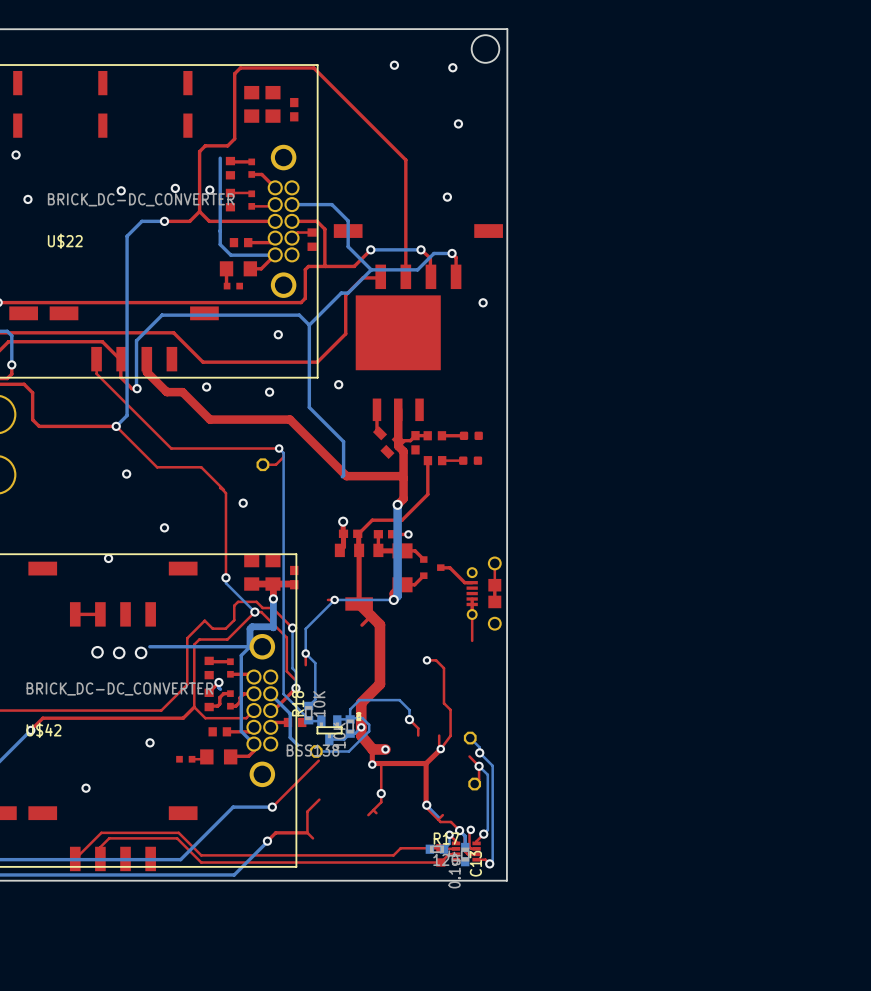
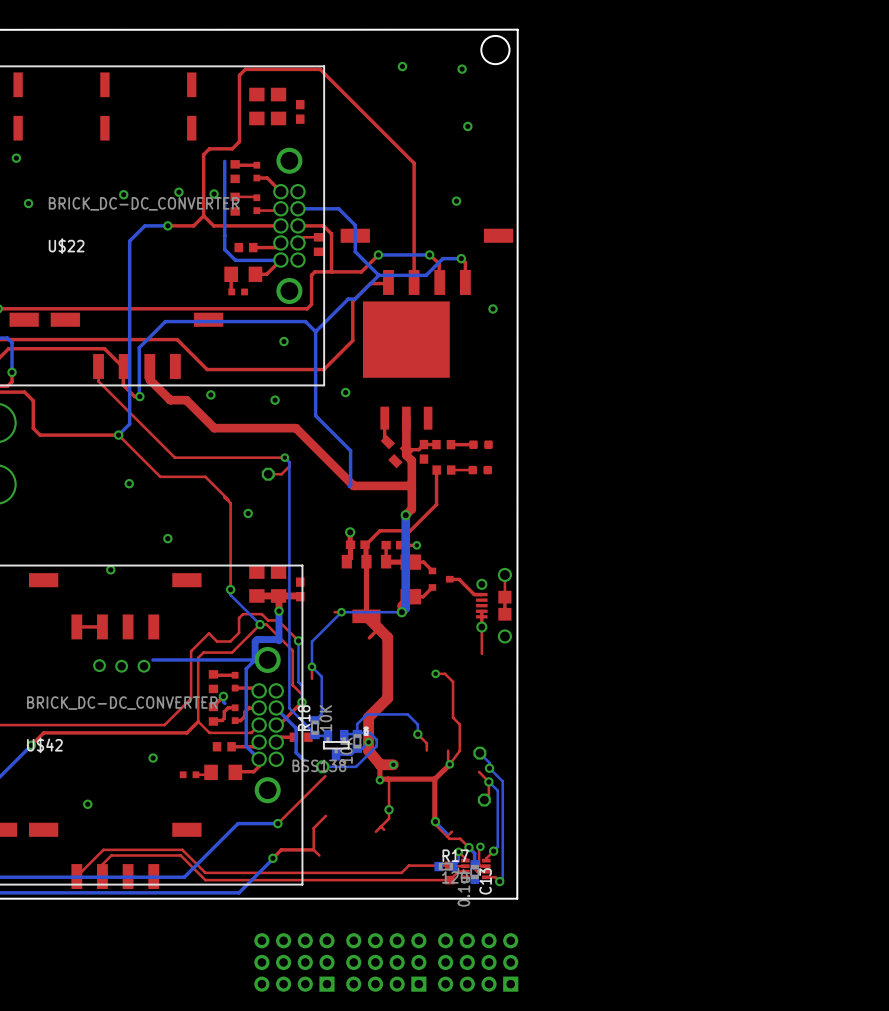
part: none -> (294, 962)
part: none -> (386, 962)
part: none -> (478, 962)

